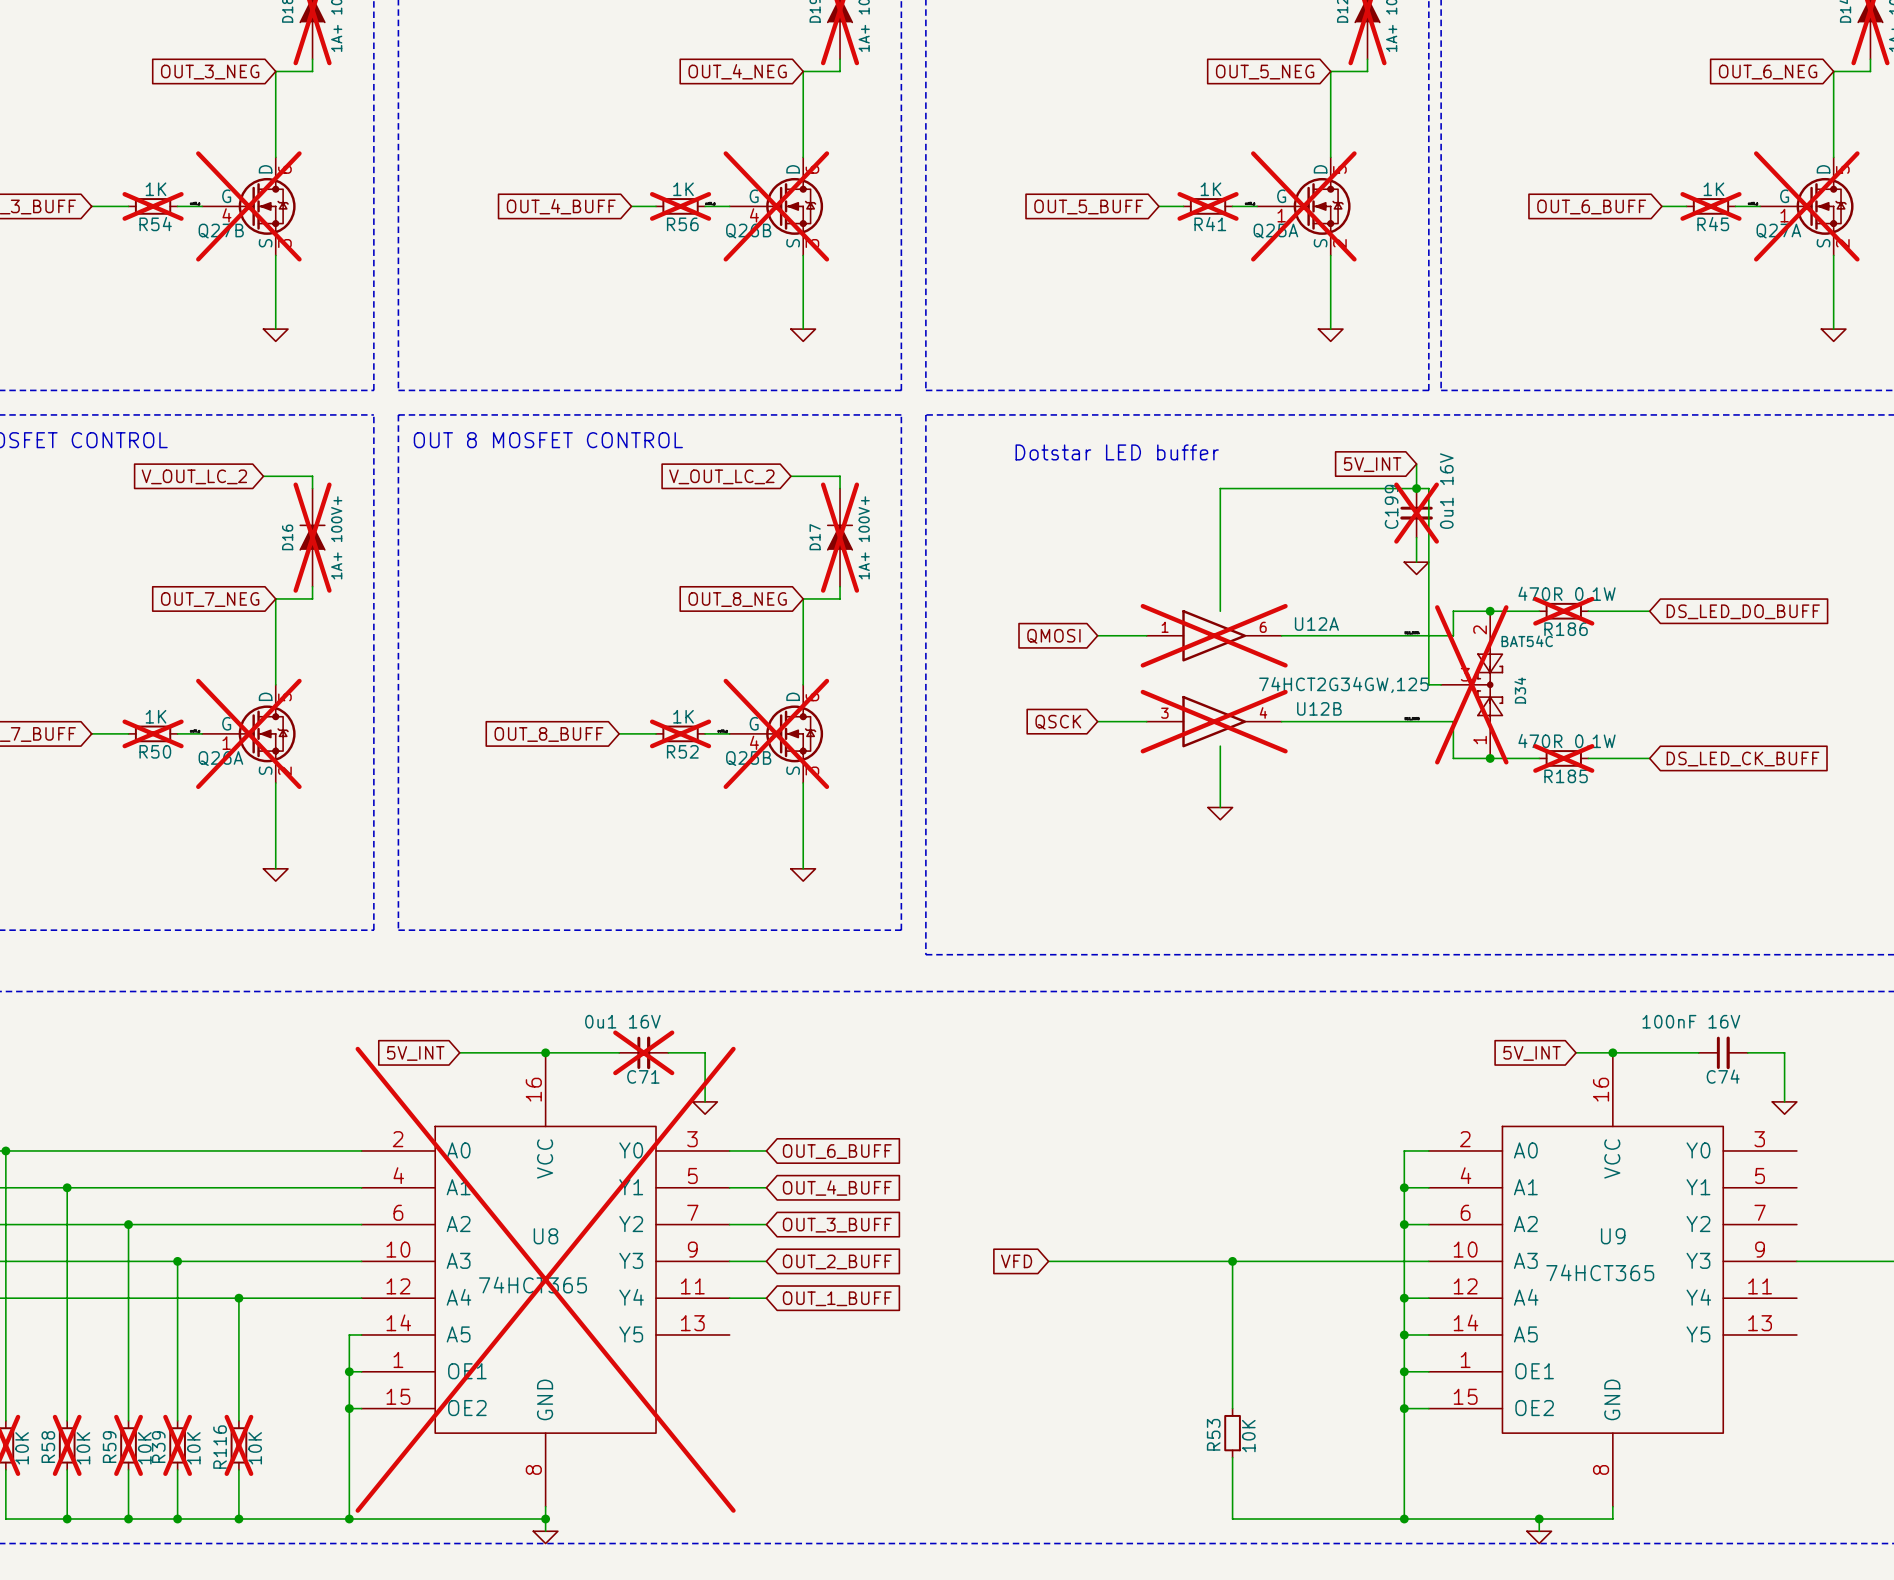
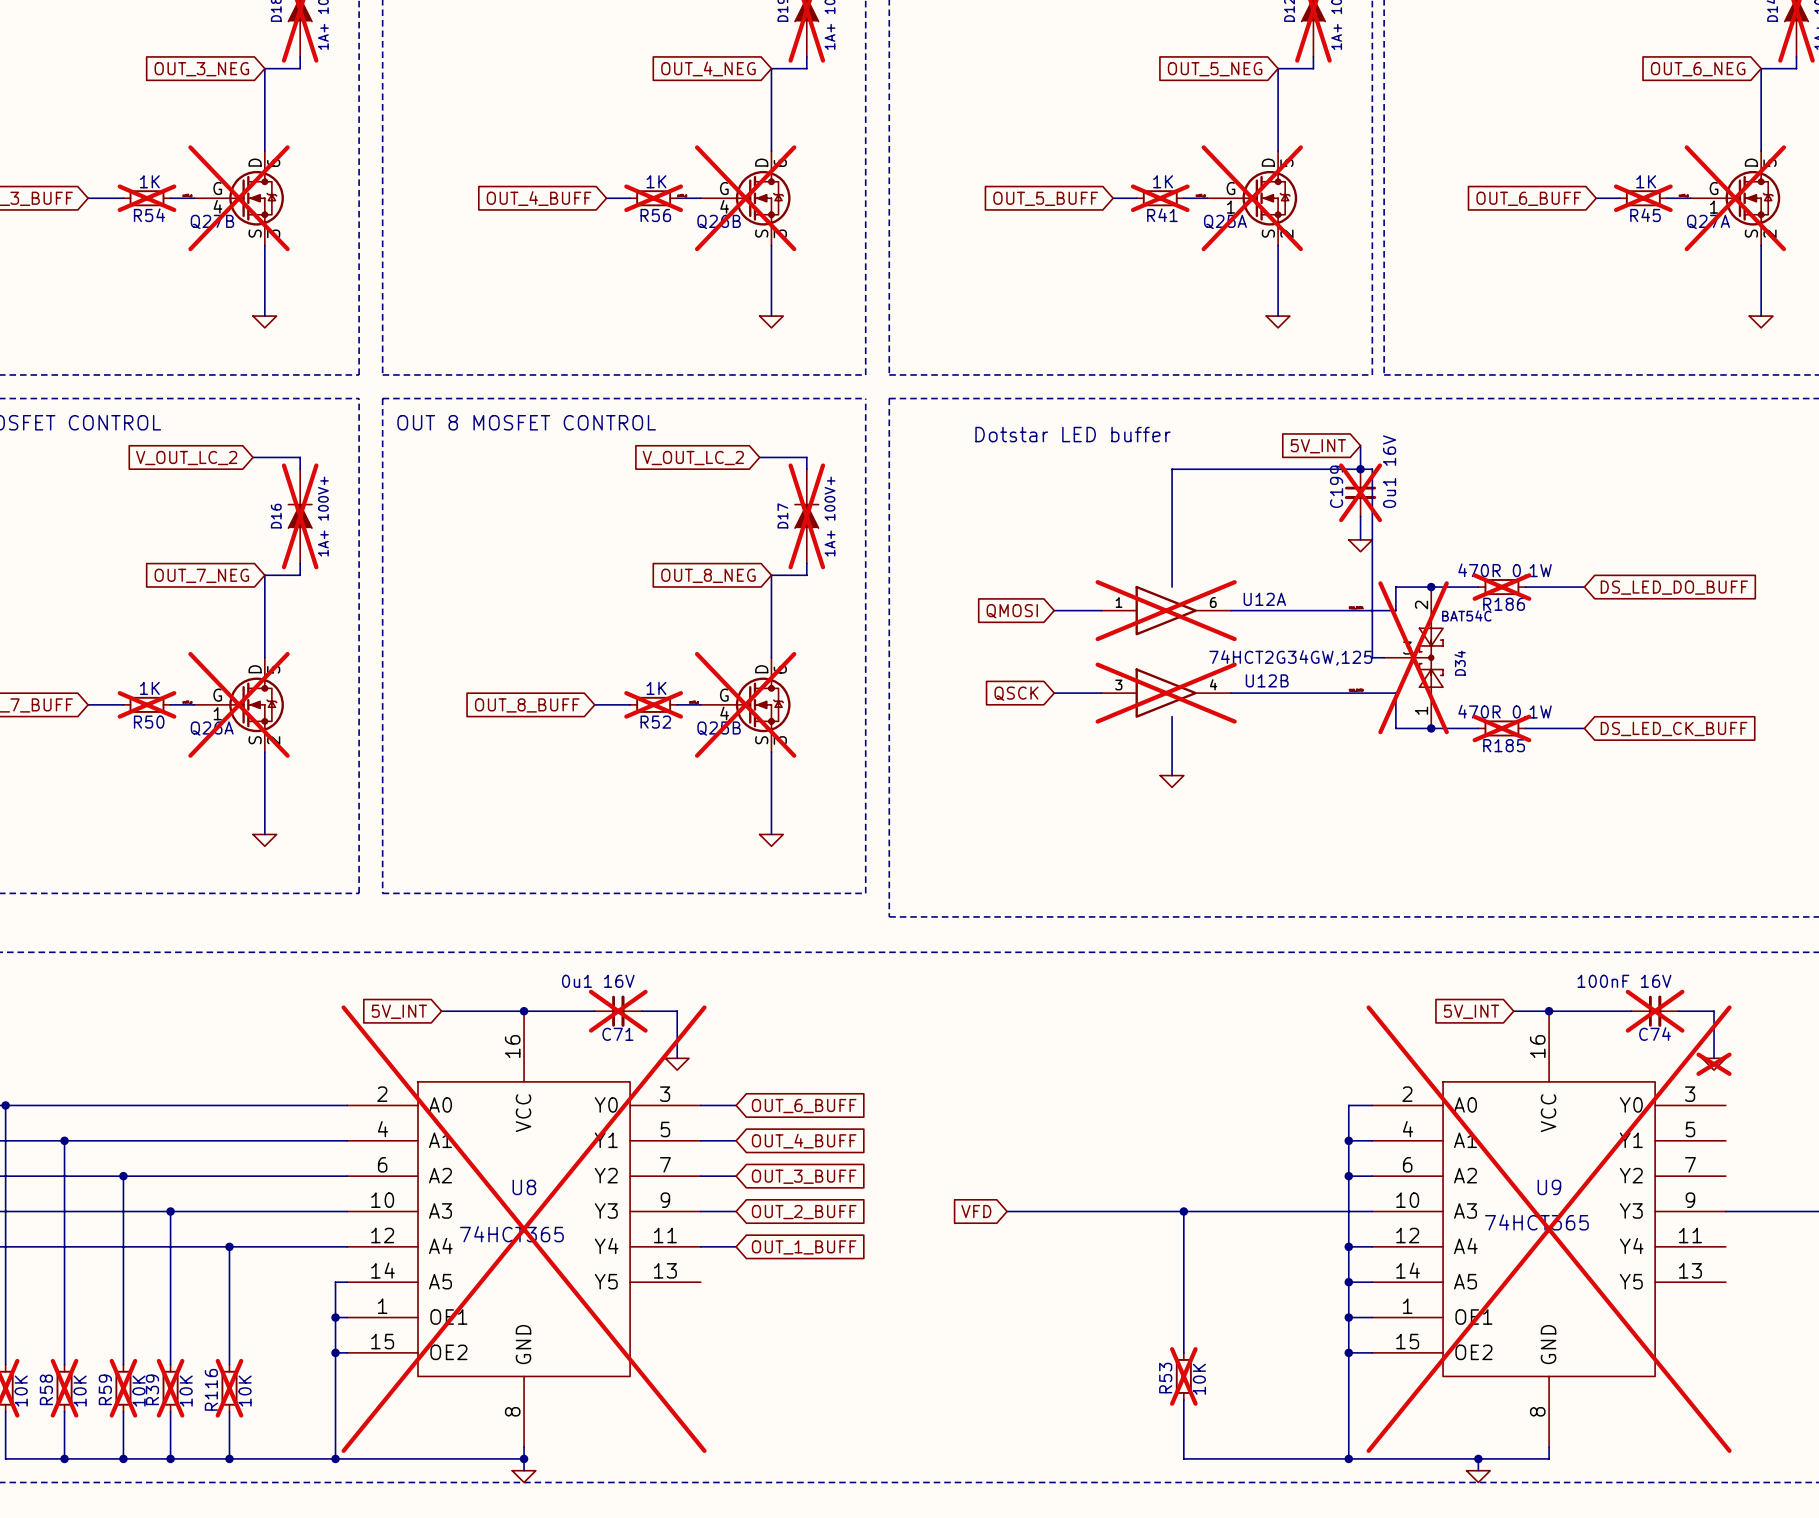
C74 do-not-place cross: none -> (1655, 1011)
power symbol do-not-place cross: none -> (1714, 1064)
U9 do-not-place cross: none -> (1549, 1229)
R53 do-not-place cross: none -> (1183, 1376)

